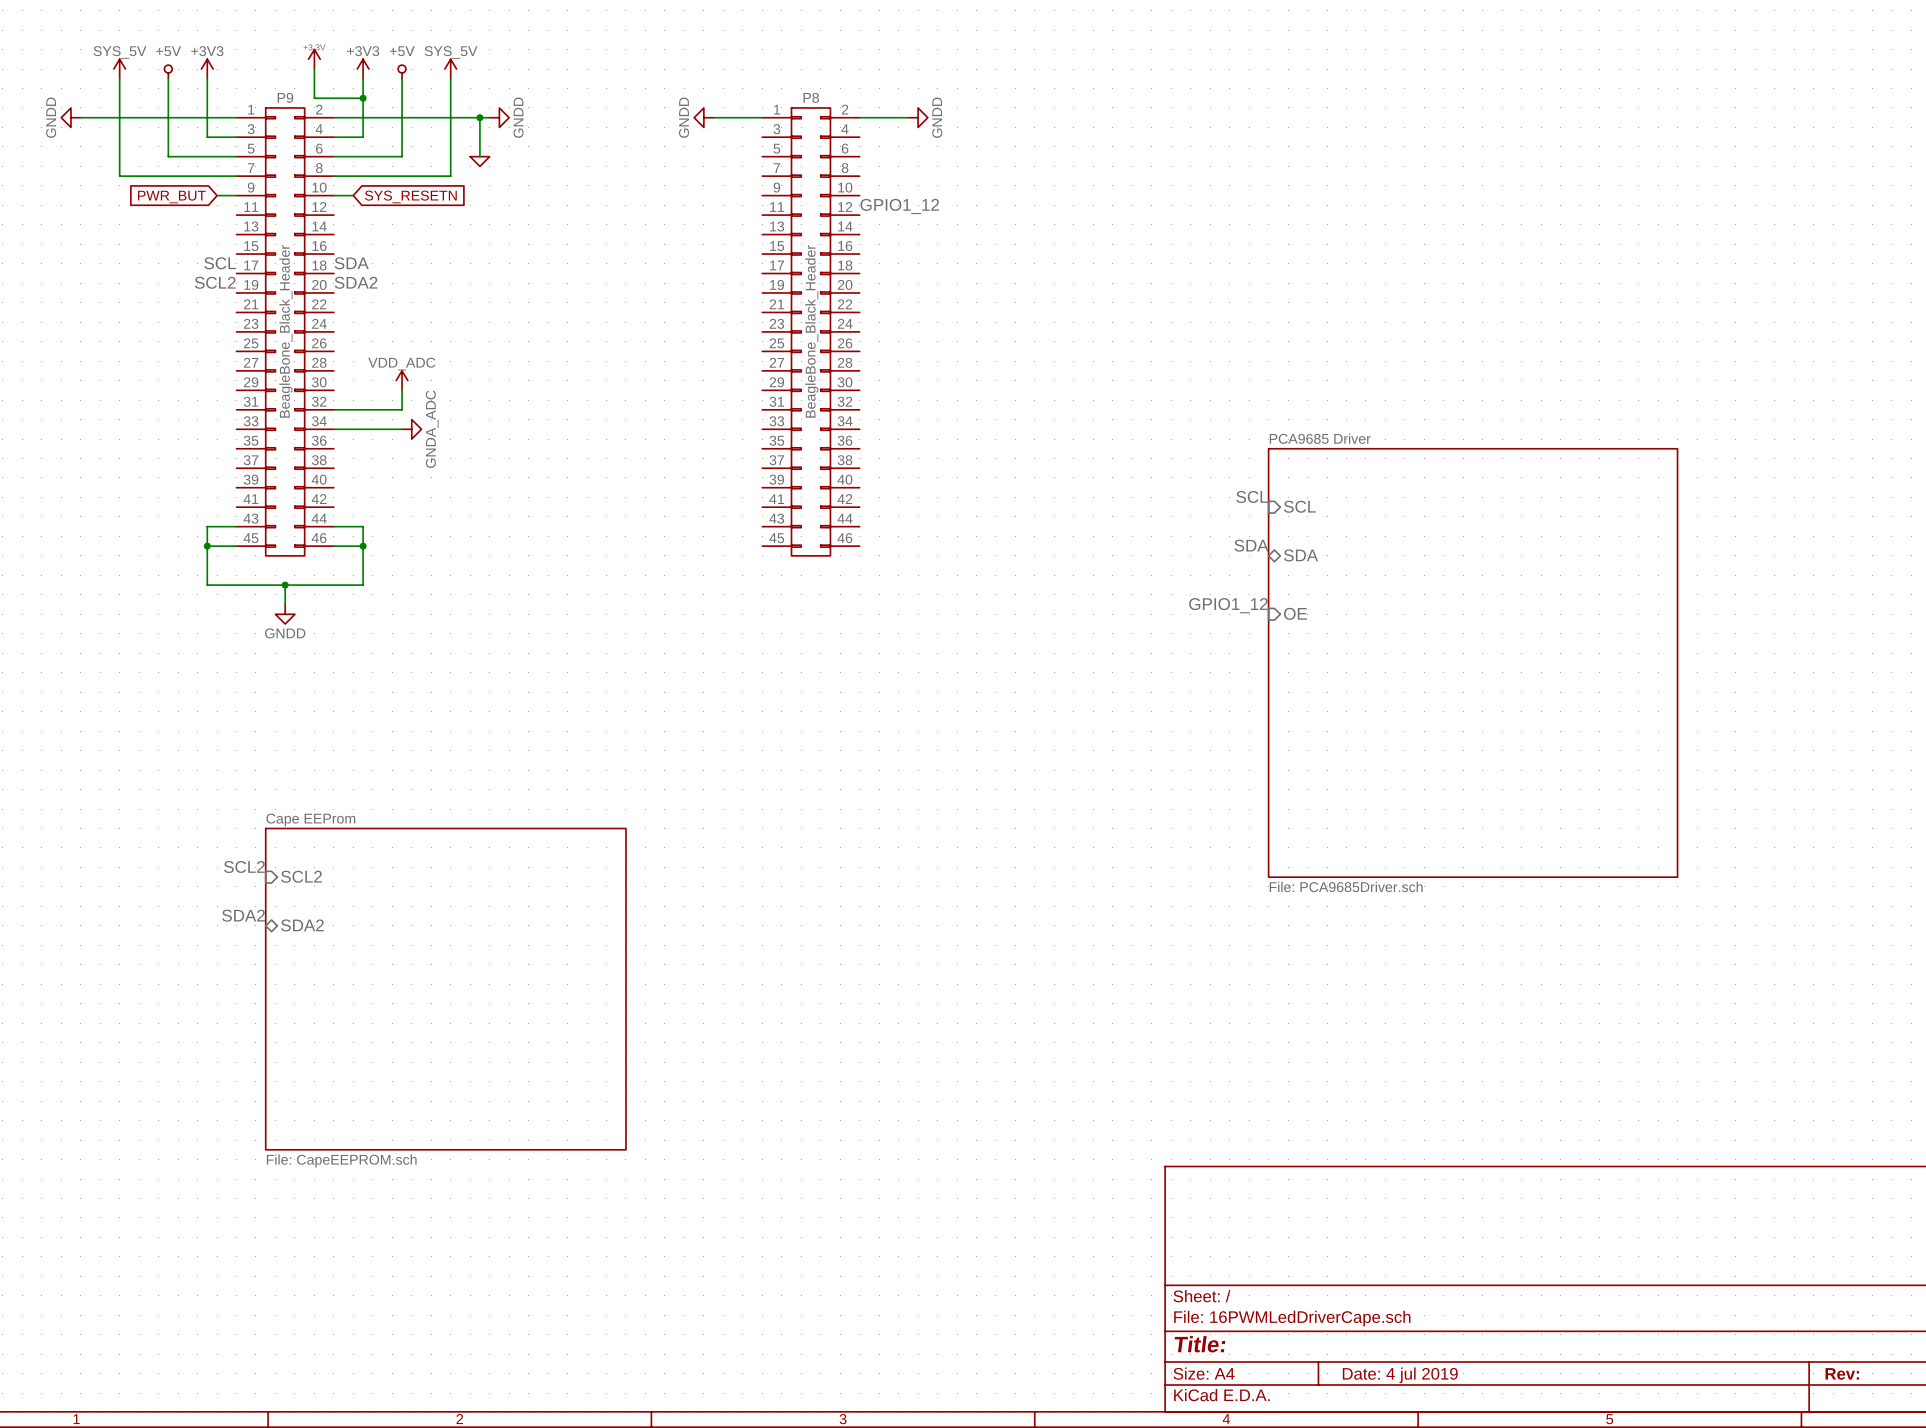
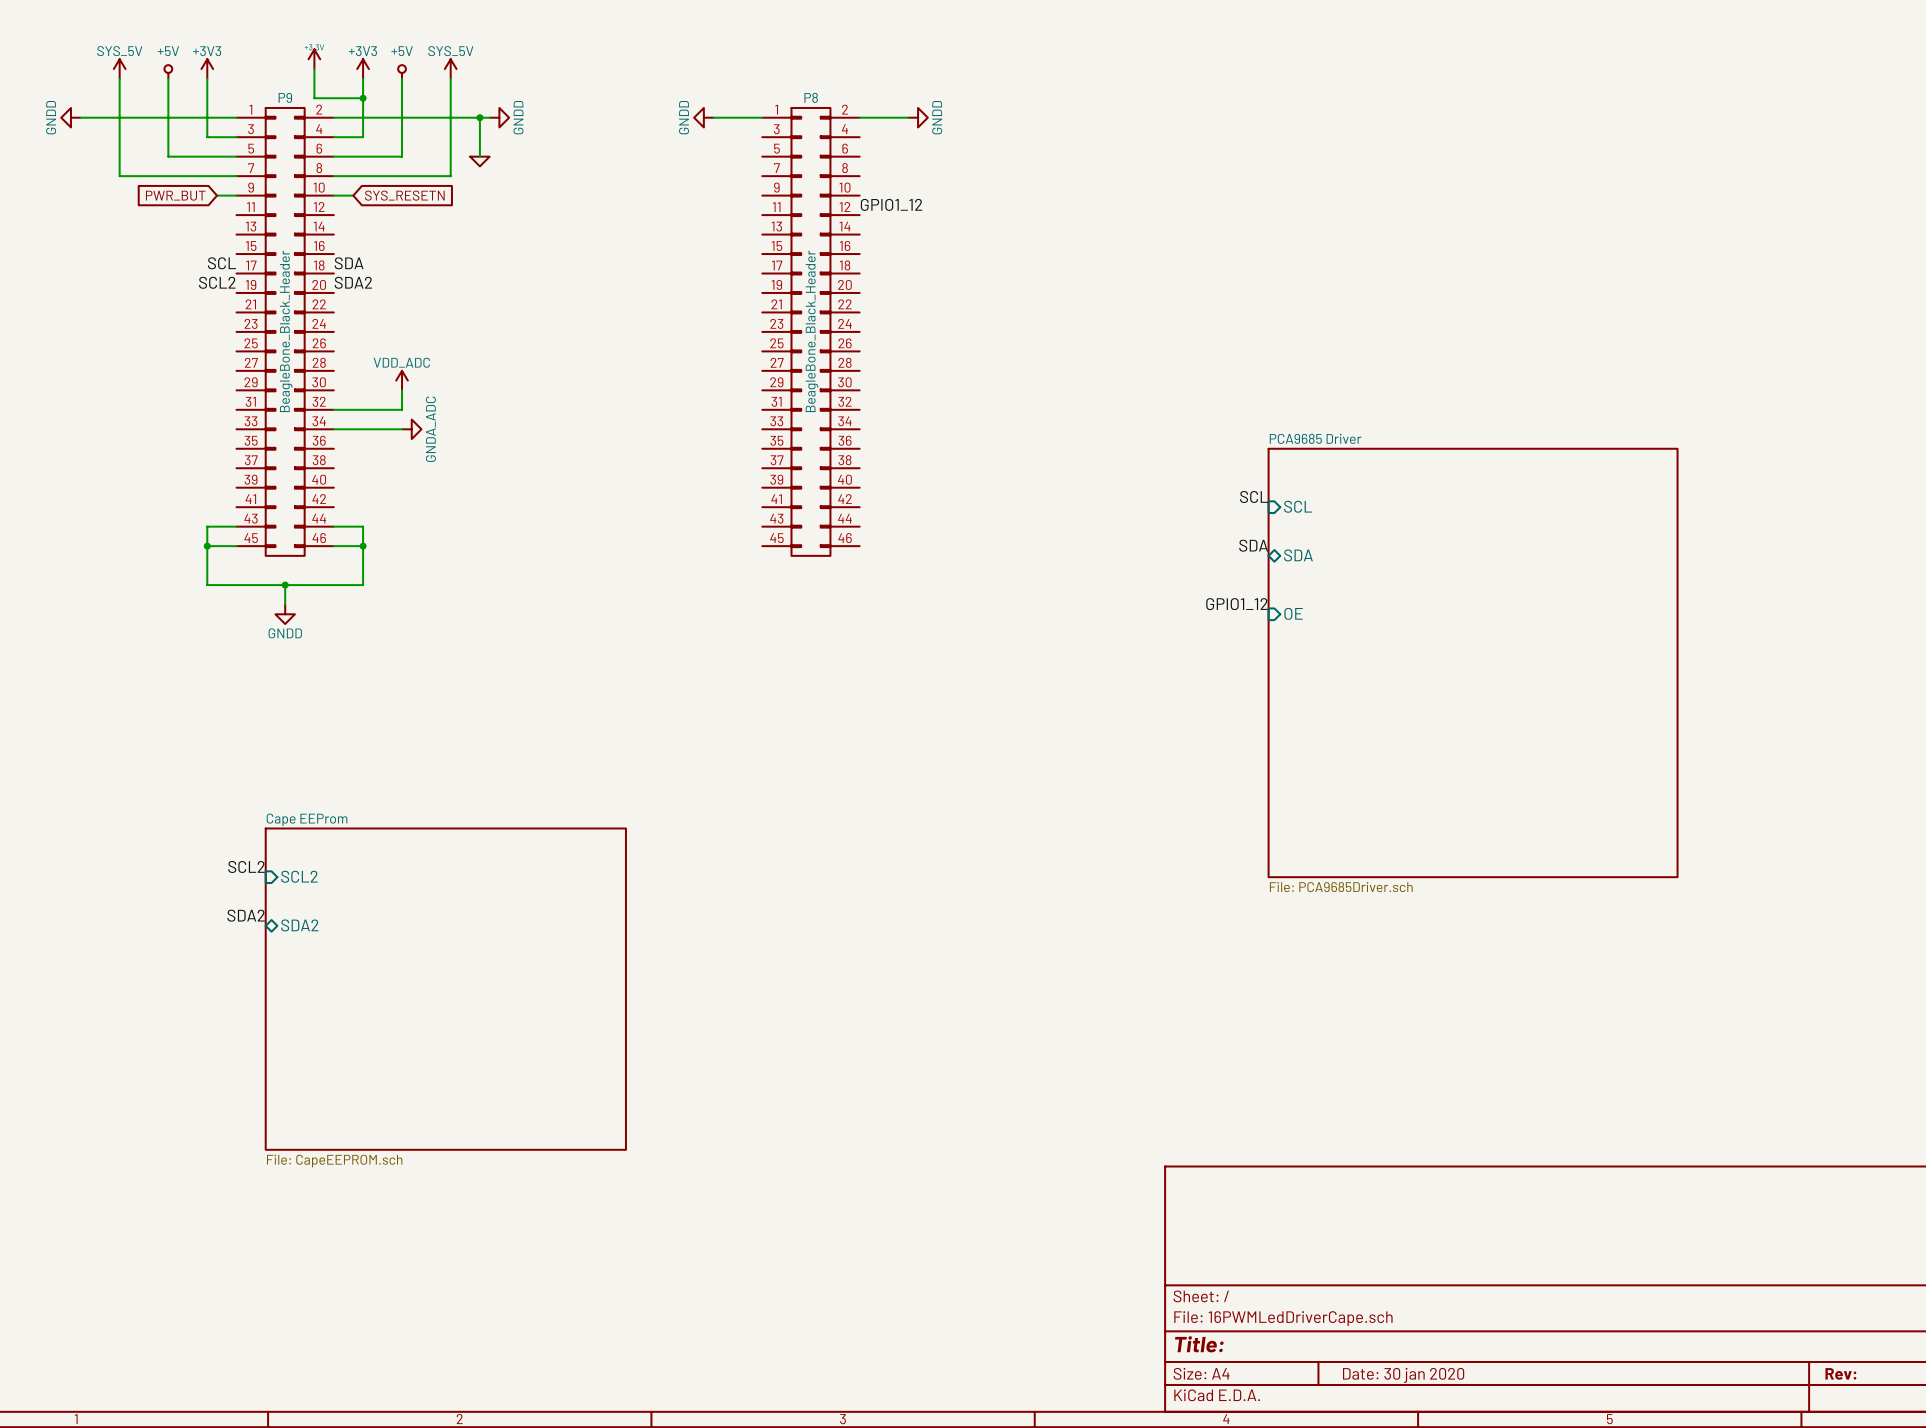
title block: Date: 4 jul 2019 (1400, 1375) -> Date: 30 jan 2020 (1403, 1375)

